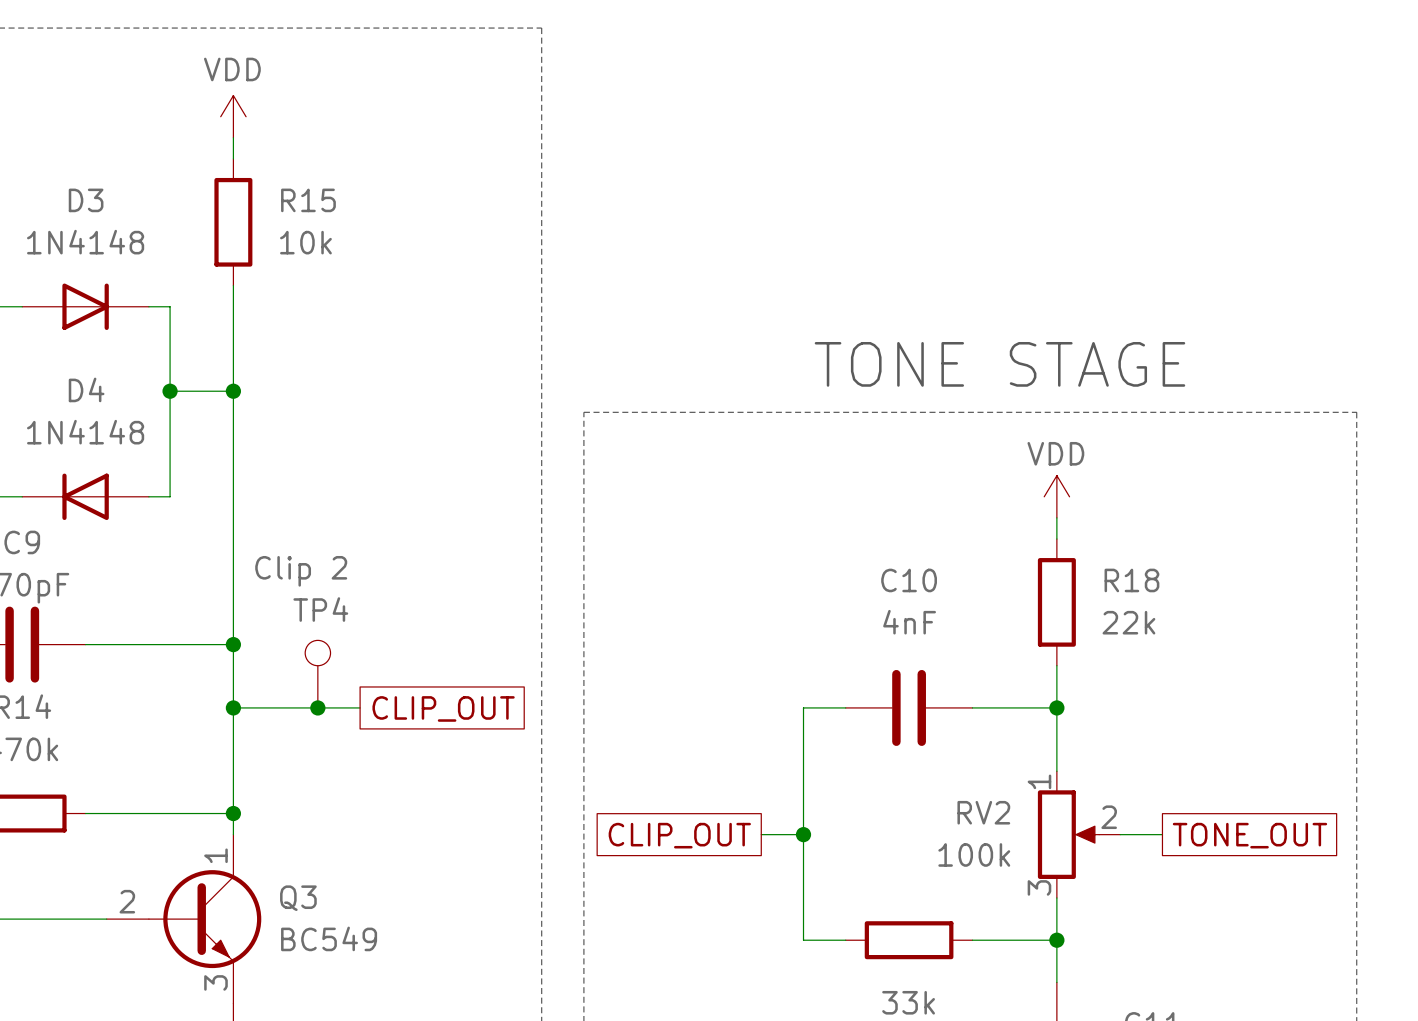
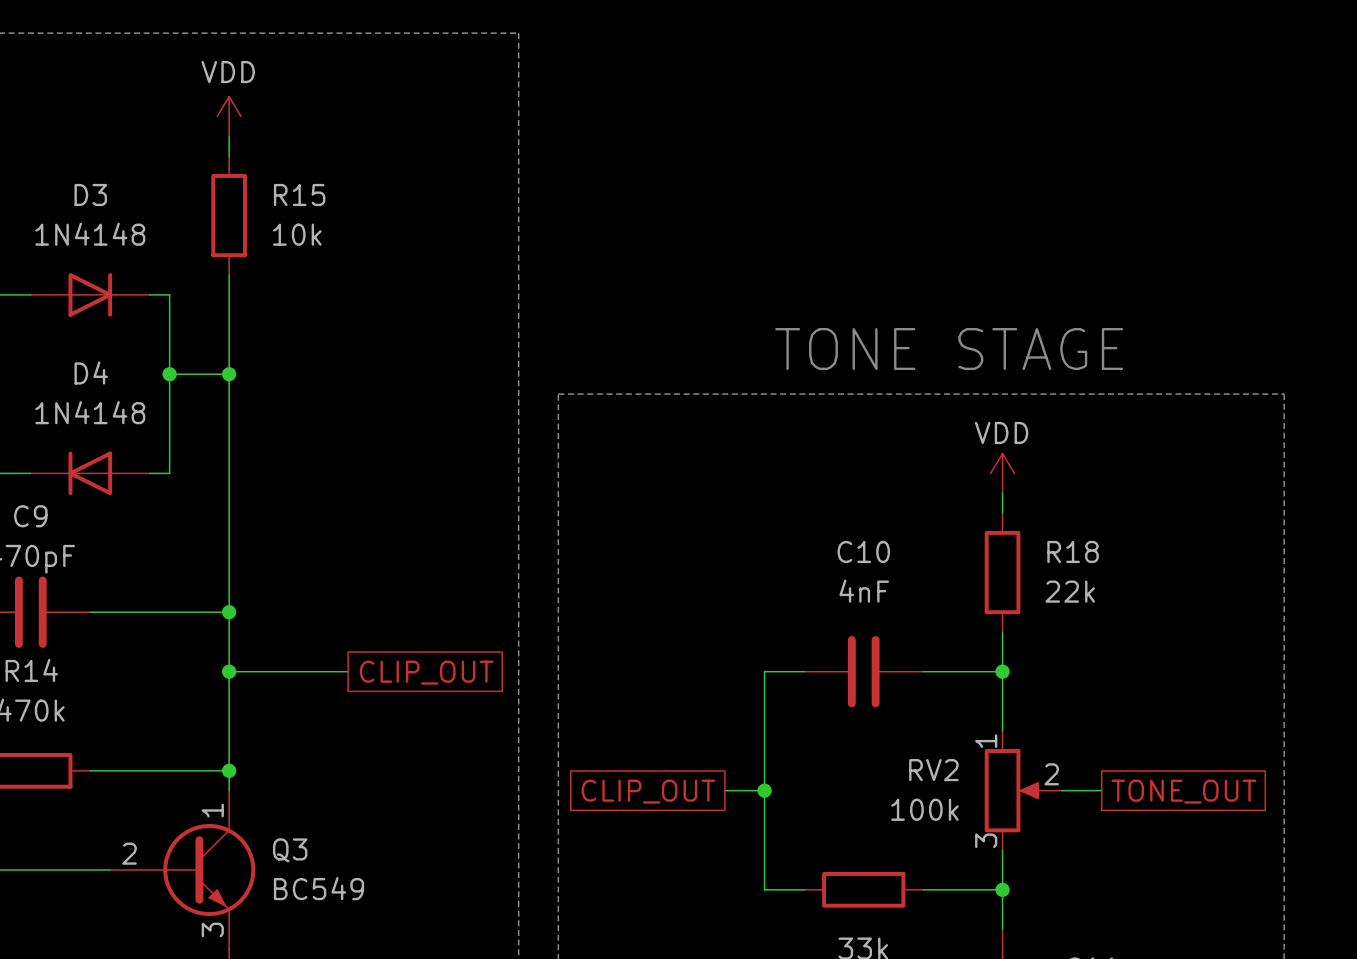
TP4: Clip 2 (317, 674) -> none
junction: (317, 707) -> none

